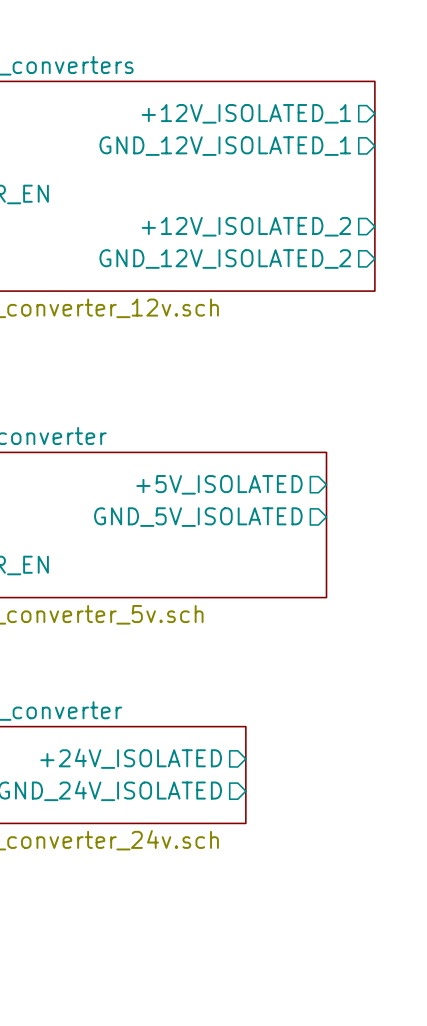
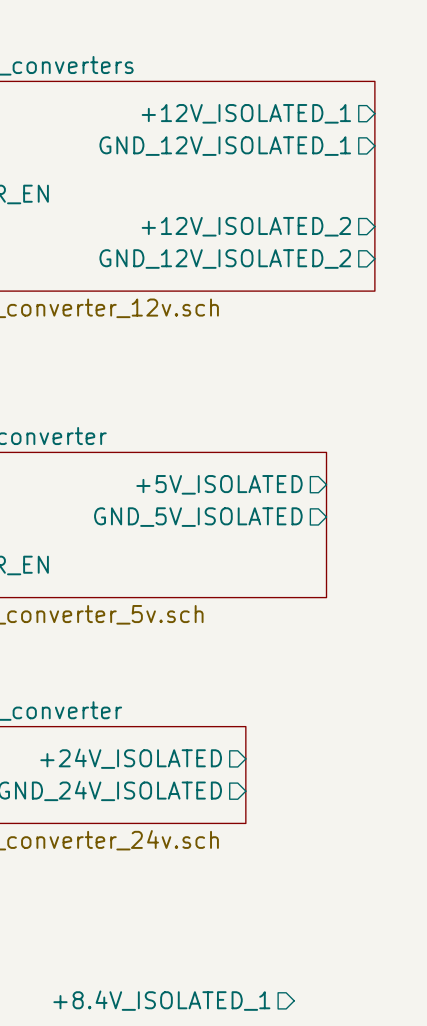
sheet pin: none -> +8.4V_ISOLATED_1 (161, 1000)

